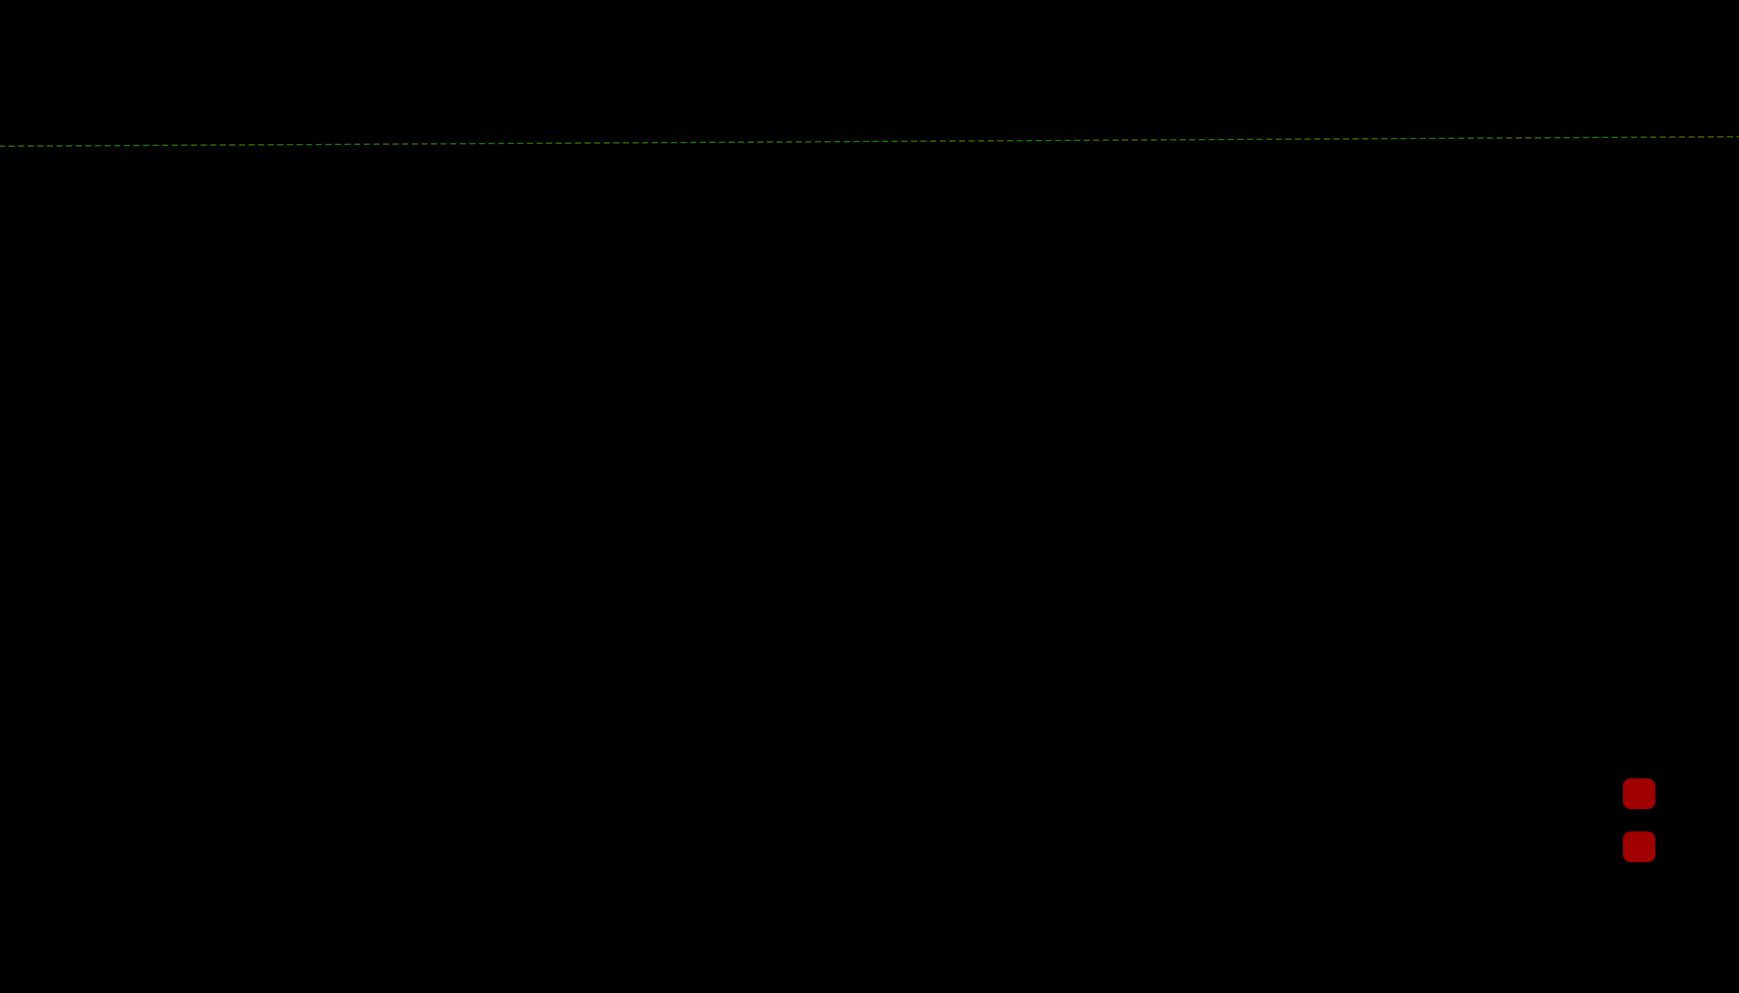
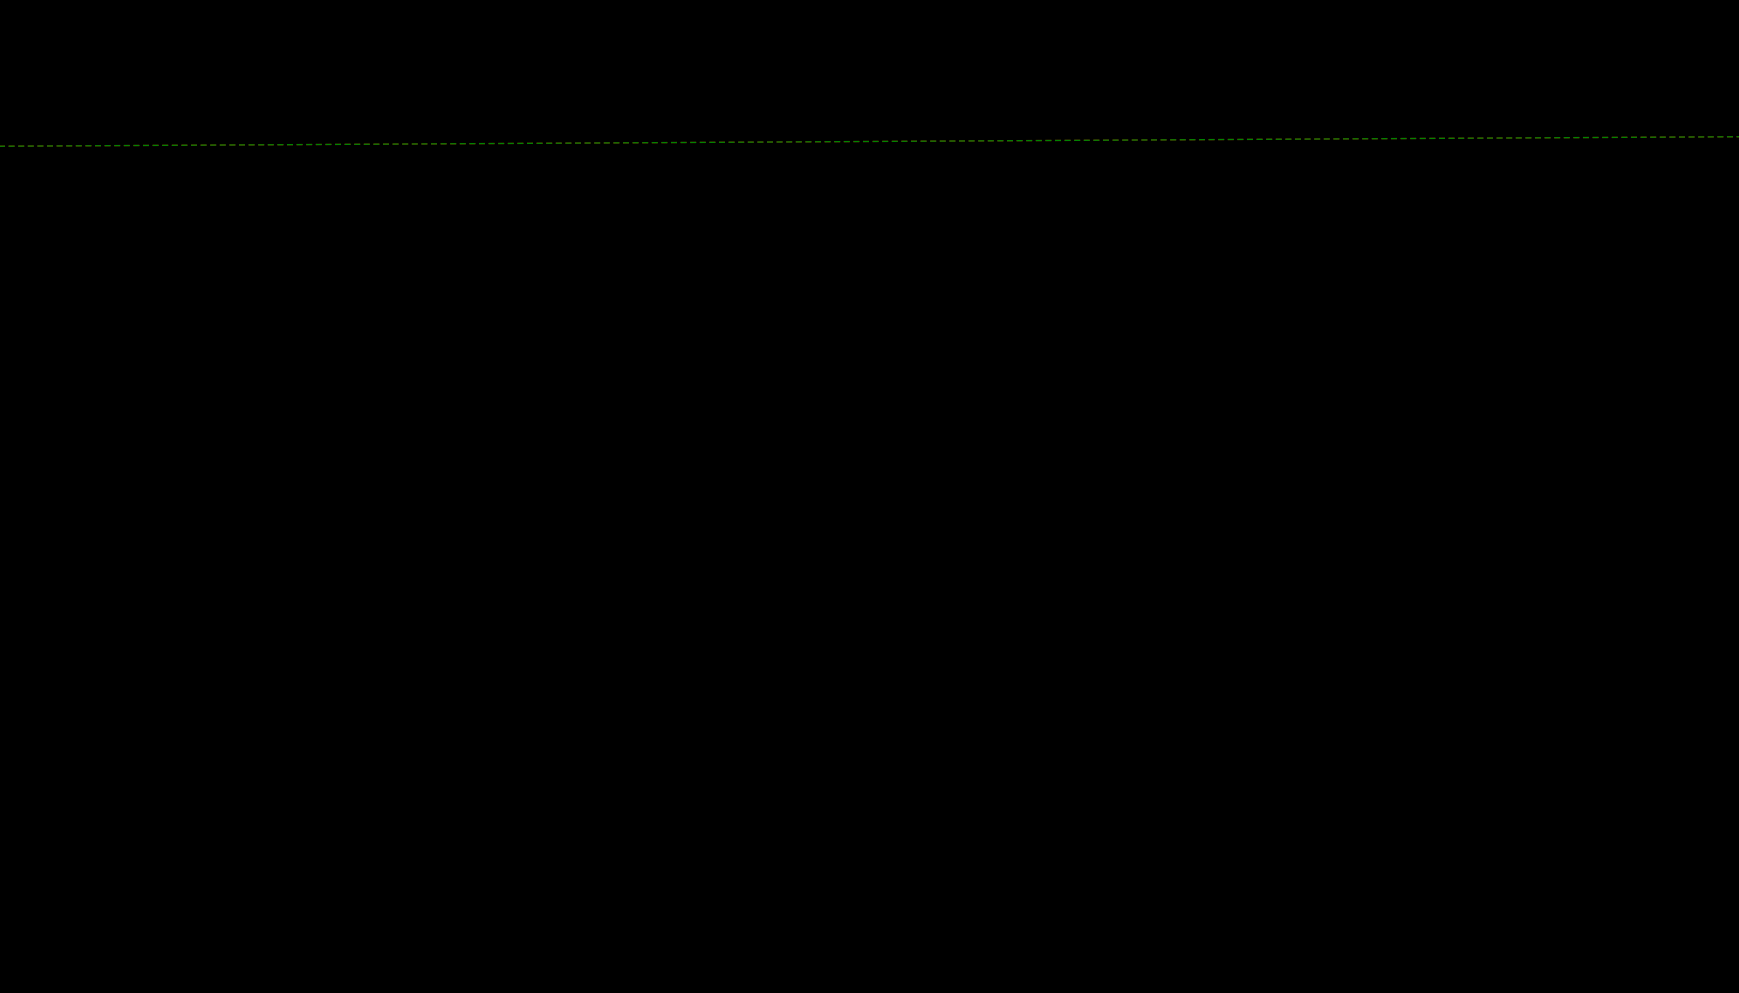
part: (1639, 820) -> none

